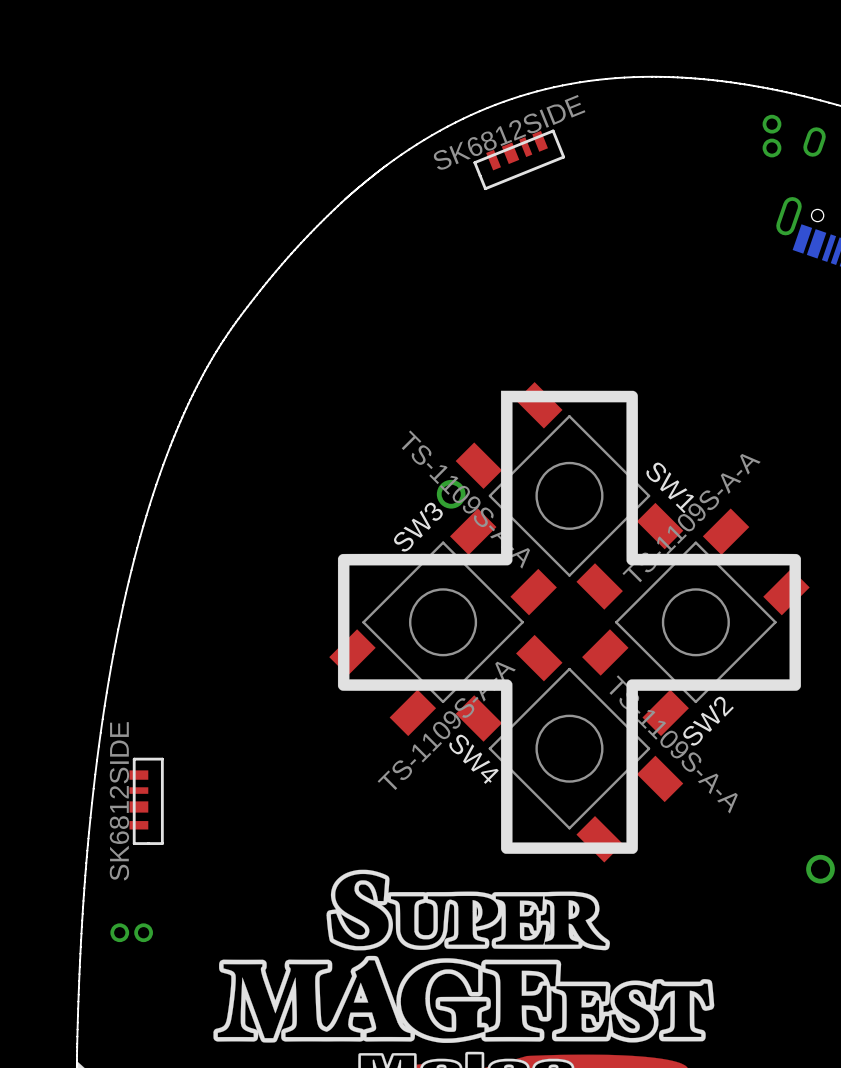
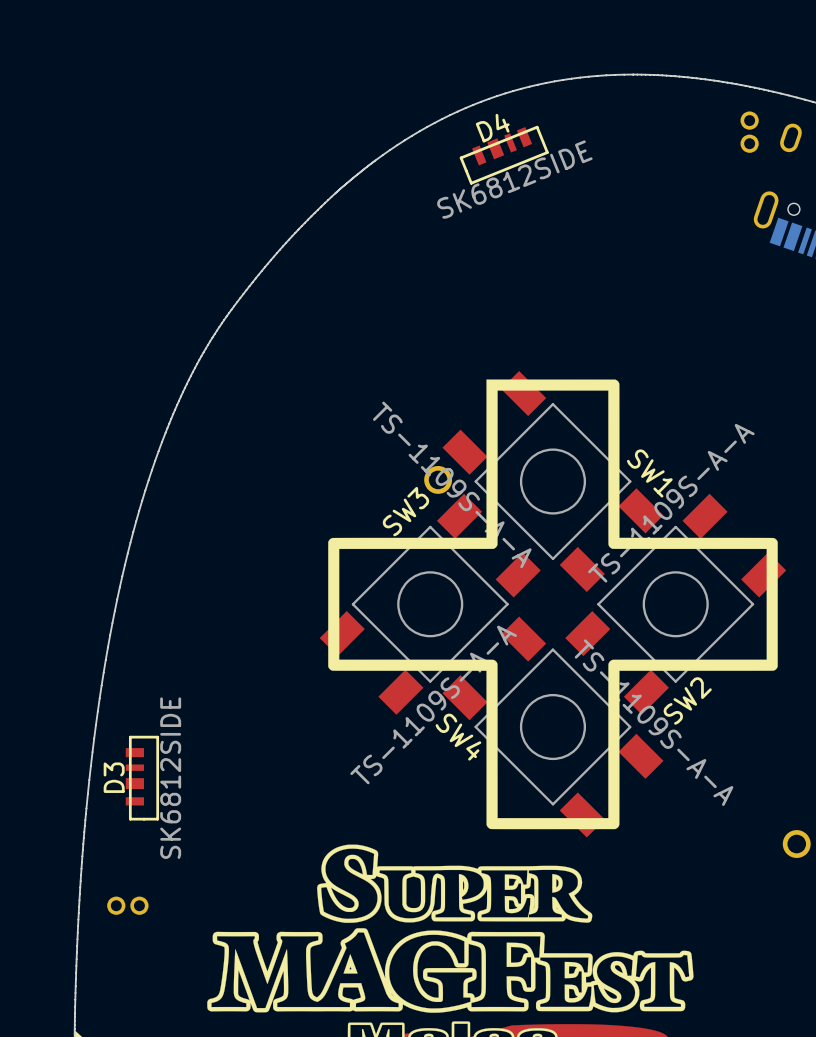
D4 name: none -> D4 (492, 128)
D4 value position: SK6812SIDE (509, 133) -> SK6812SIDE (514, 179)
D3 name: none -> D3 (114, 777)
D3 value position: SK6812SIDE (119, 801) -> SK6812SIDE (170, 778)

